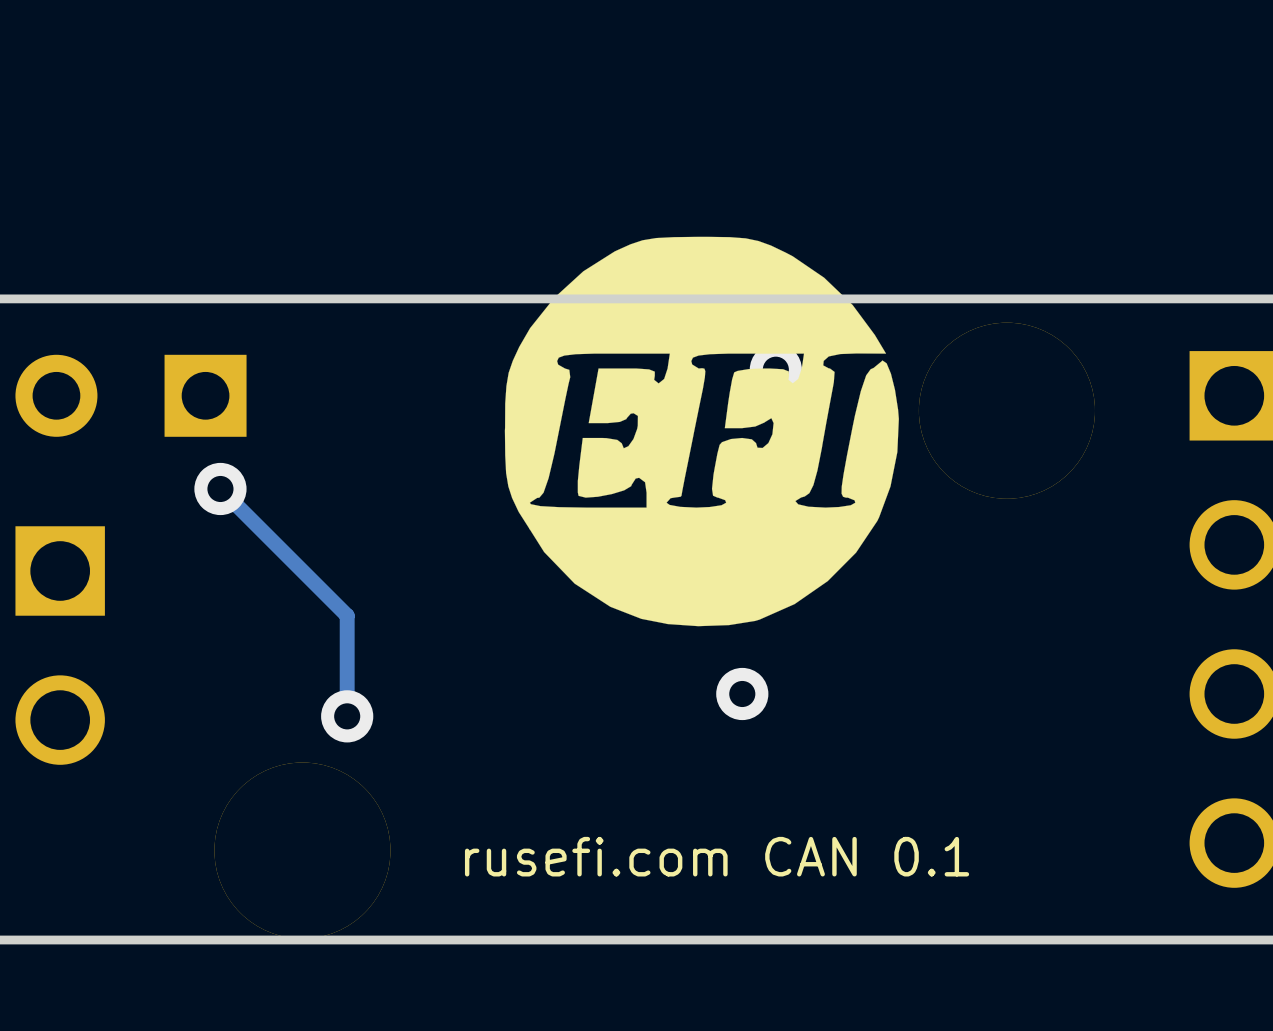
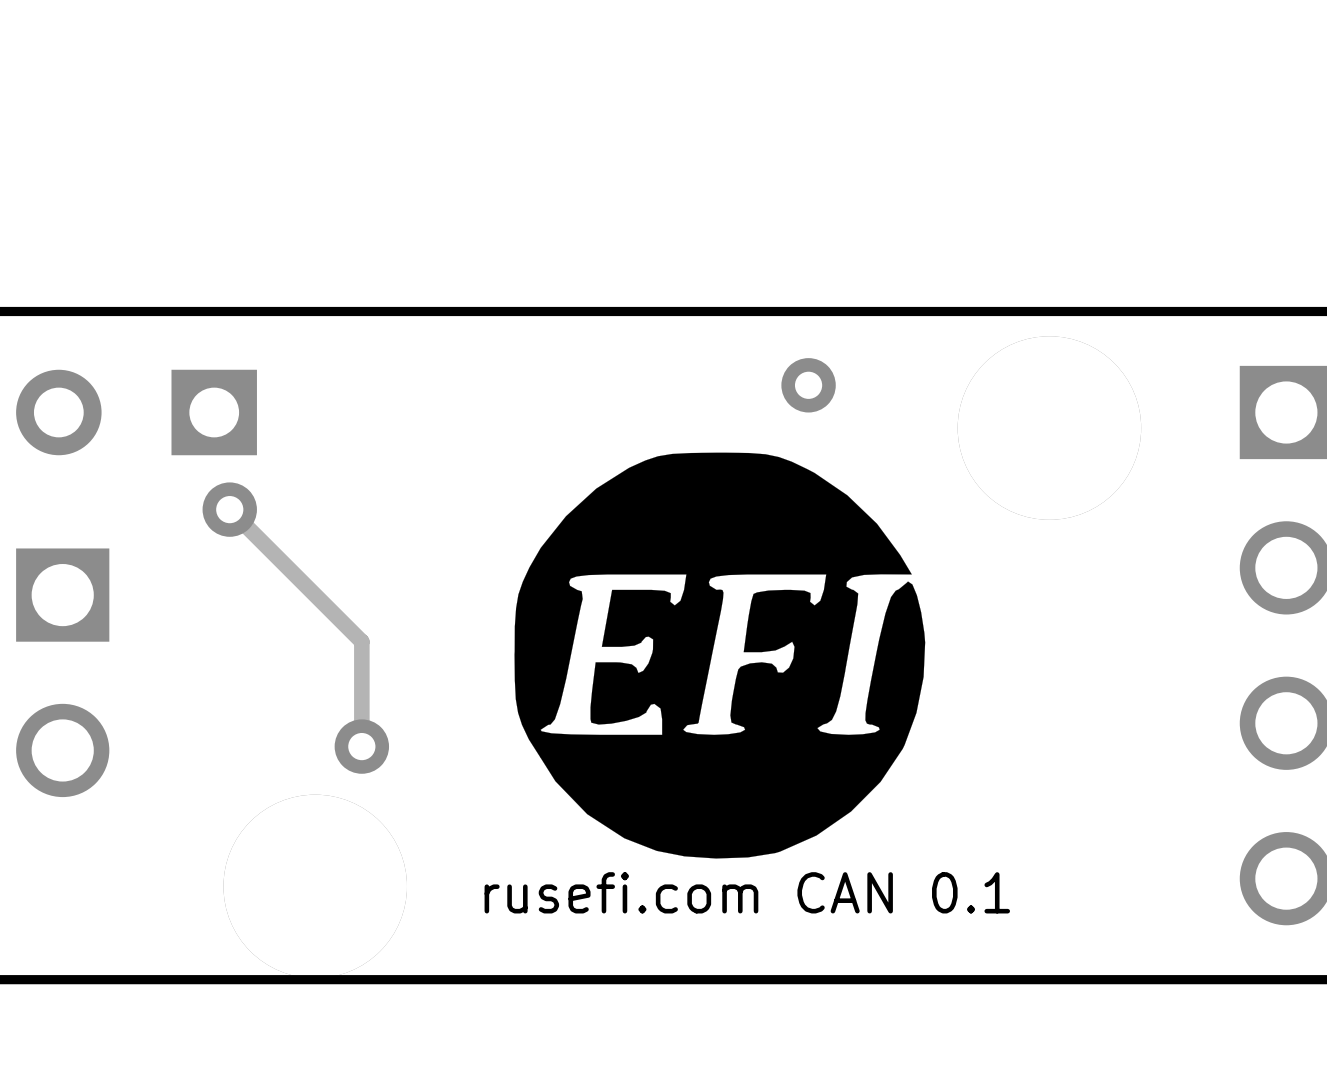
drawing position: (701, 431) -> (719, 655)

